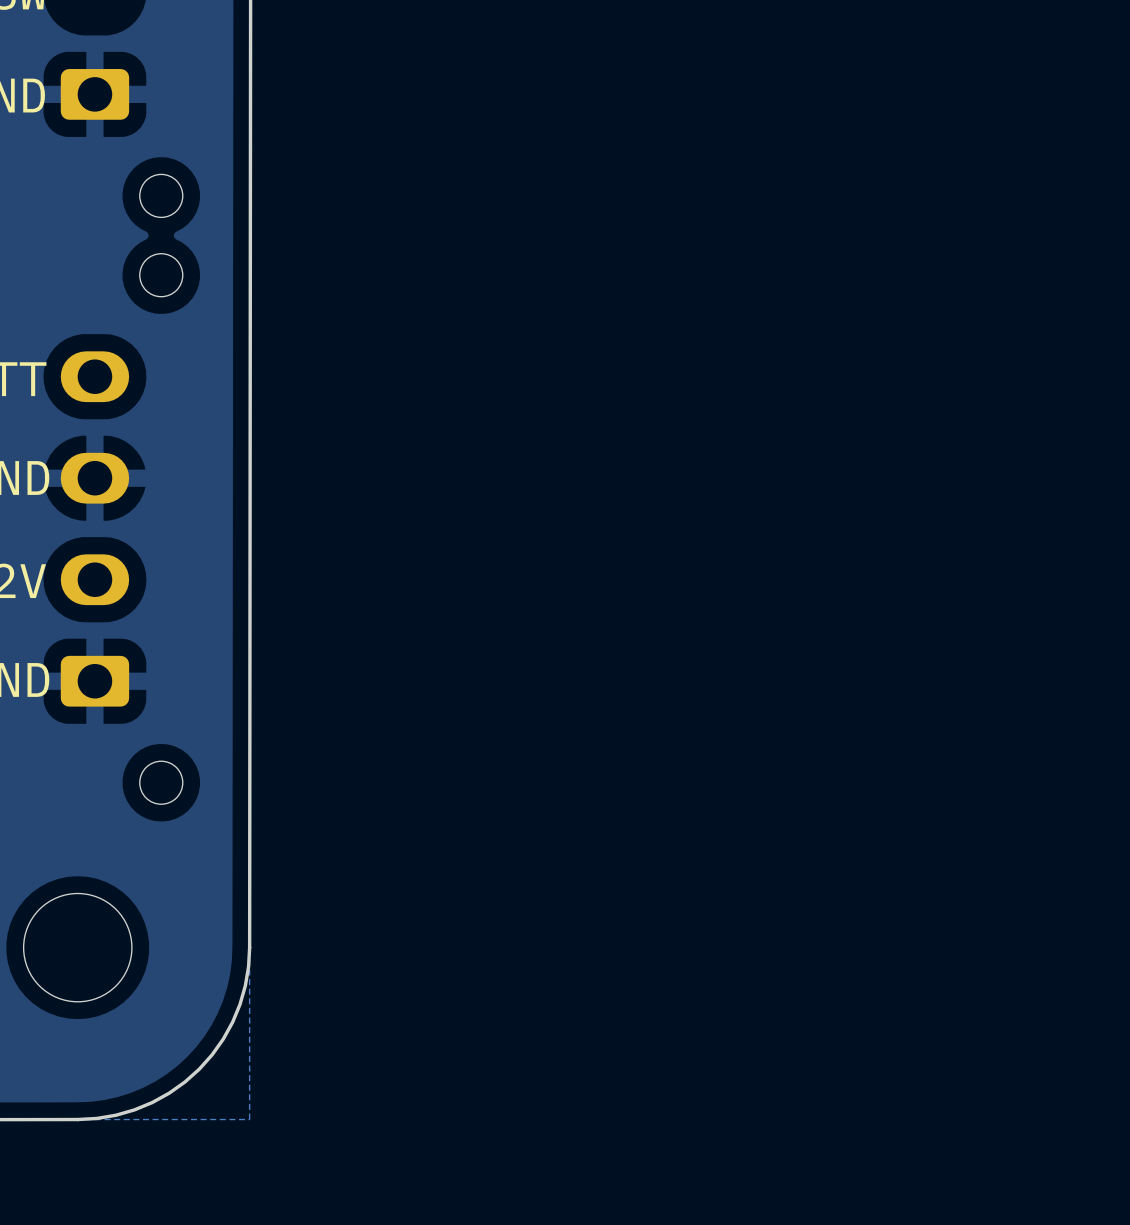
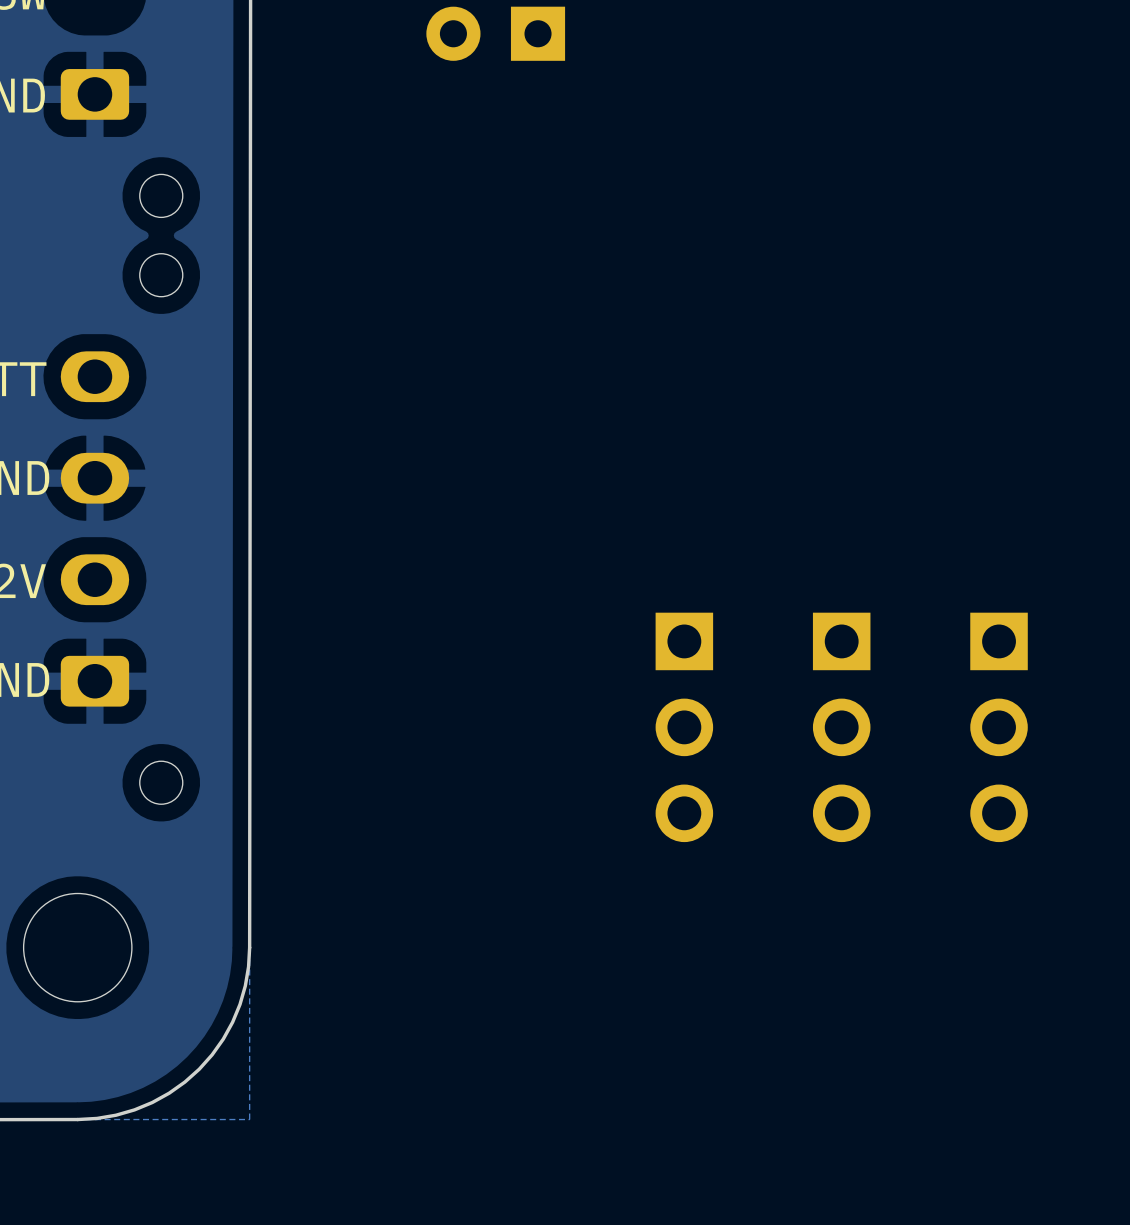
part: none -> (495, 33)
part: none -> (684, 727)
part: none -> (841, 727)
part: none -> (999, 727)

